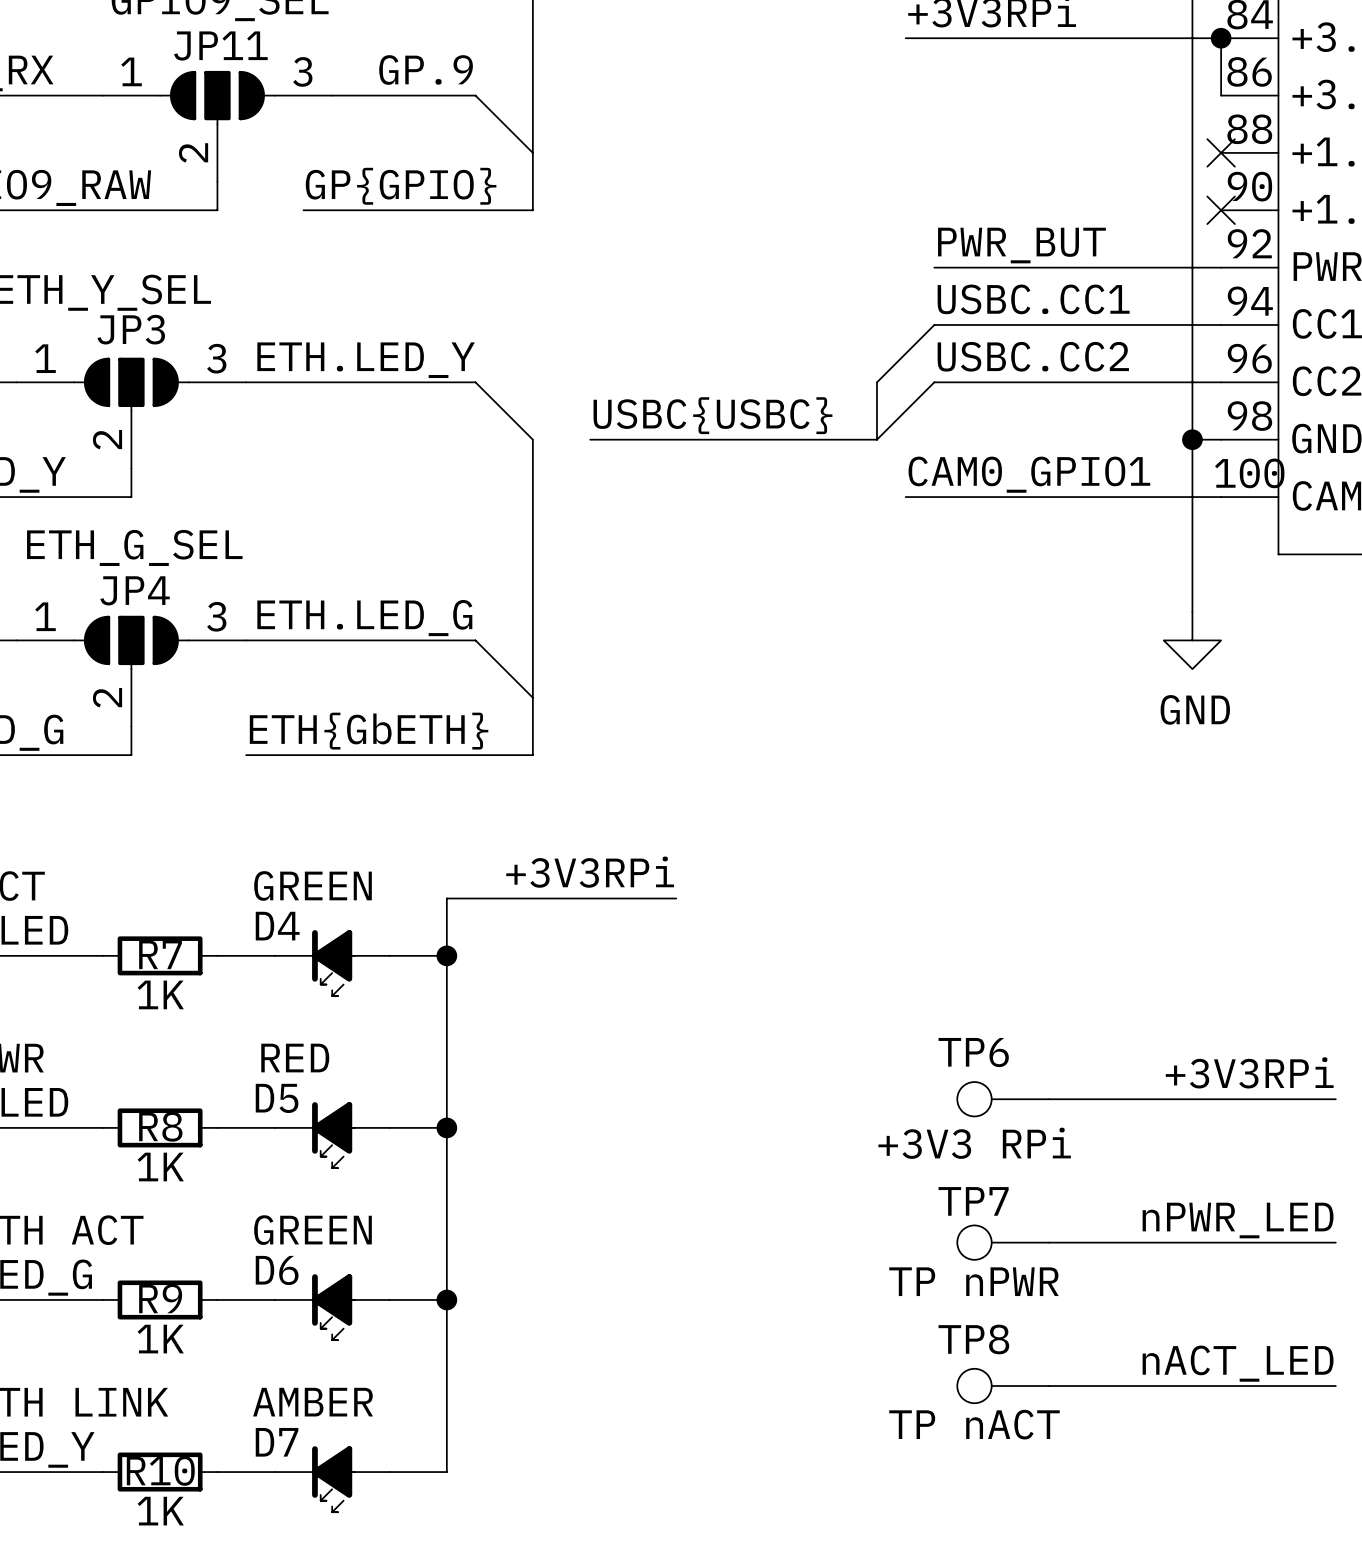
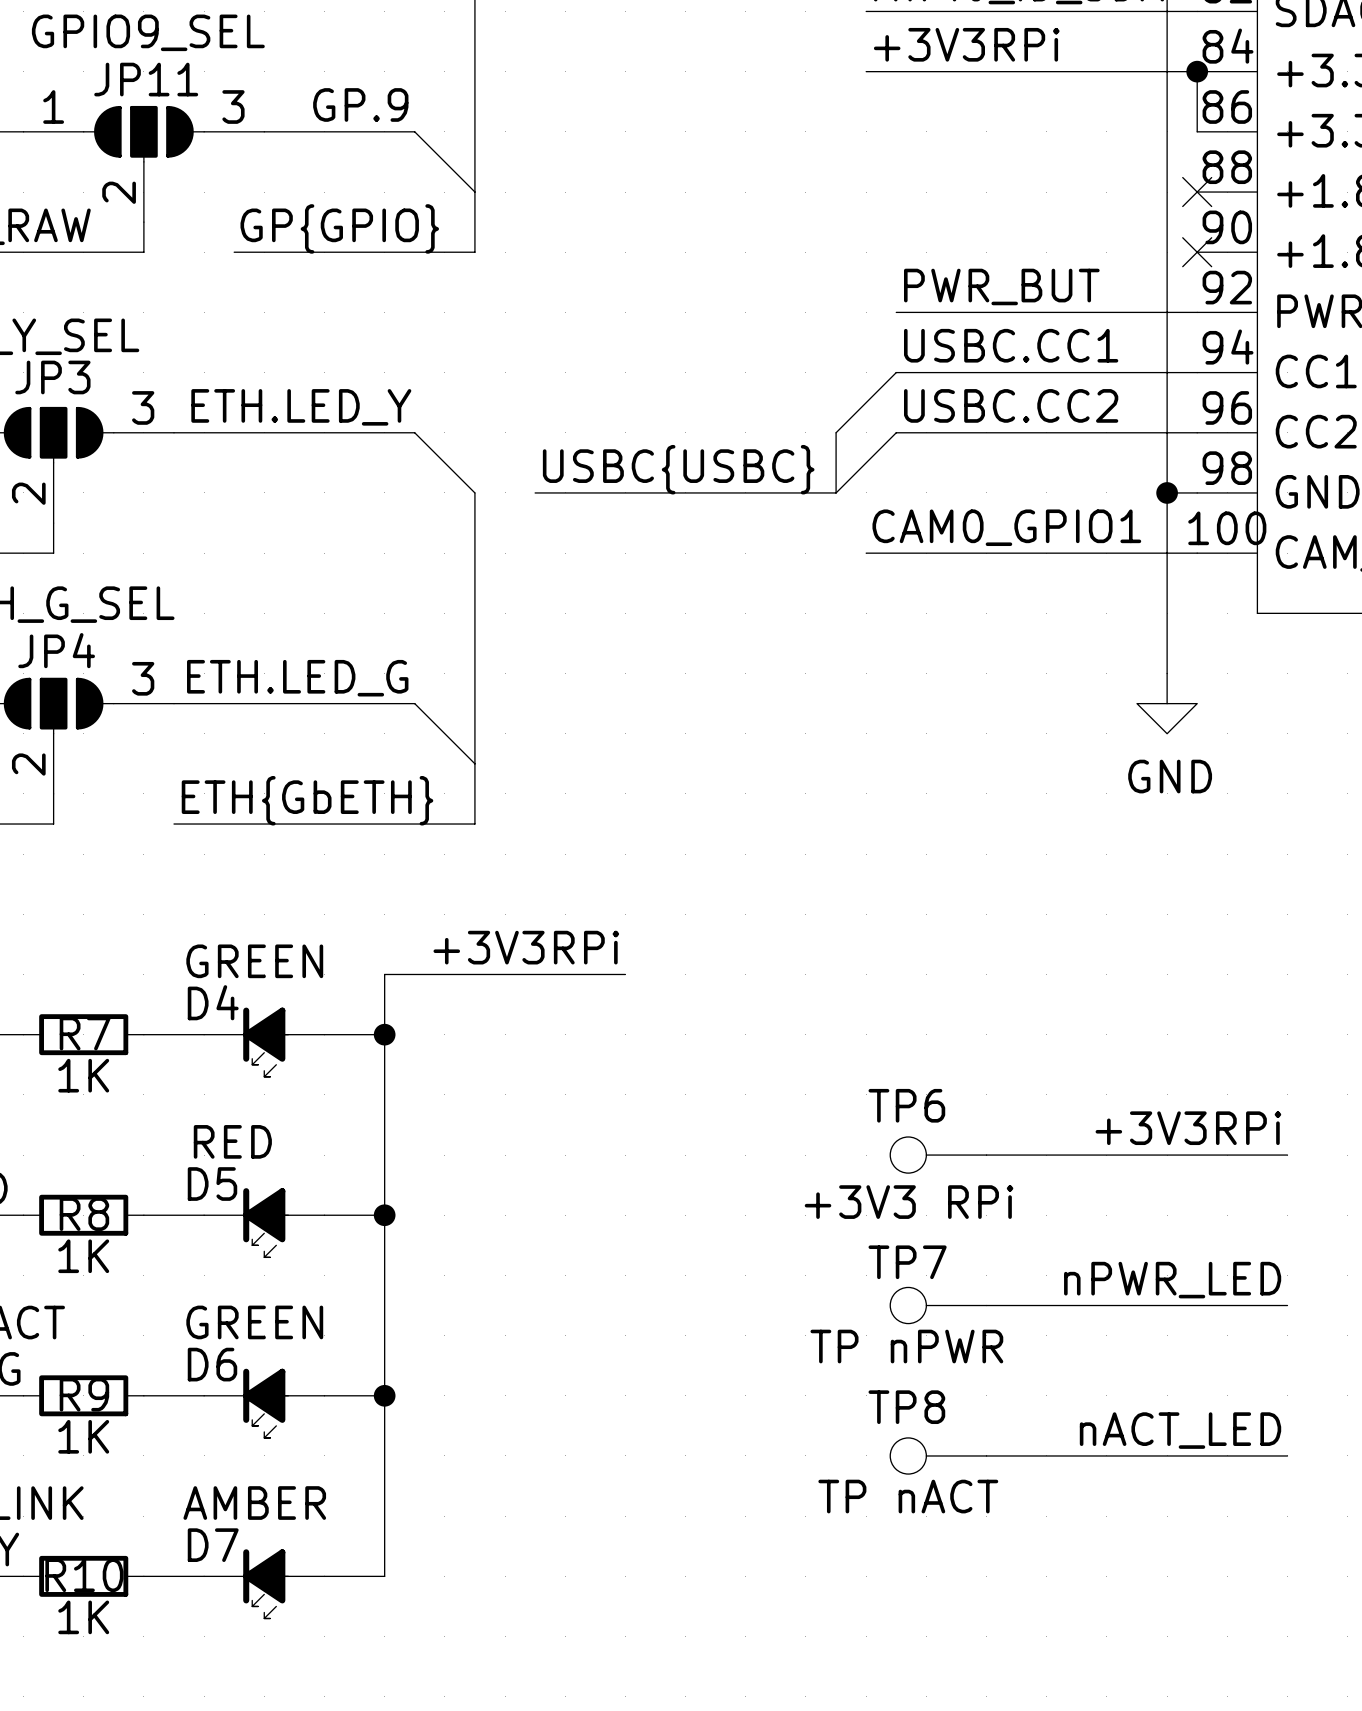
label position: +3V3RPi (1249, 1072) -> +3V3RPi (1188, 1128)
TP6 position: (1003, 1099) -> (938, 1155)
wire: (1049, 1099) (1335, 1099) -> (986, 1155) (1287, 1155)
label position: nPWR_LED (1238, 1220) -> nPWR_LED (1172, 1280)
TP7 position: (1003, 1242) -> (938, 1305)
wire: (1049, 1242) (1335, 1242) -> (986, 1305) (1287, 1305)
label position: nACT_LED (1238, 1363) -> nACT_LED (1180, 1430)
TP8 position: (1003, 1386) -> (938, 1455)
wire: (1049, 1386) (1335, 1386) -> (986, 1455) (1287, 1455)

